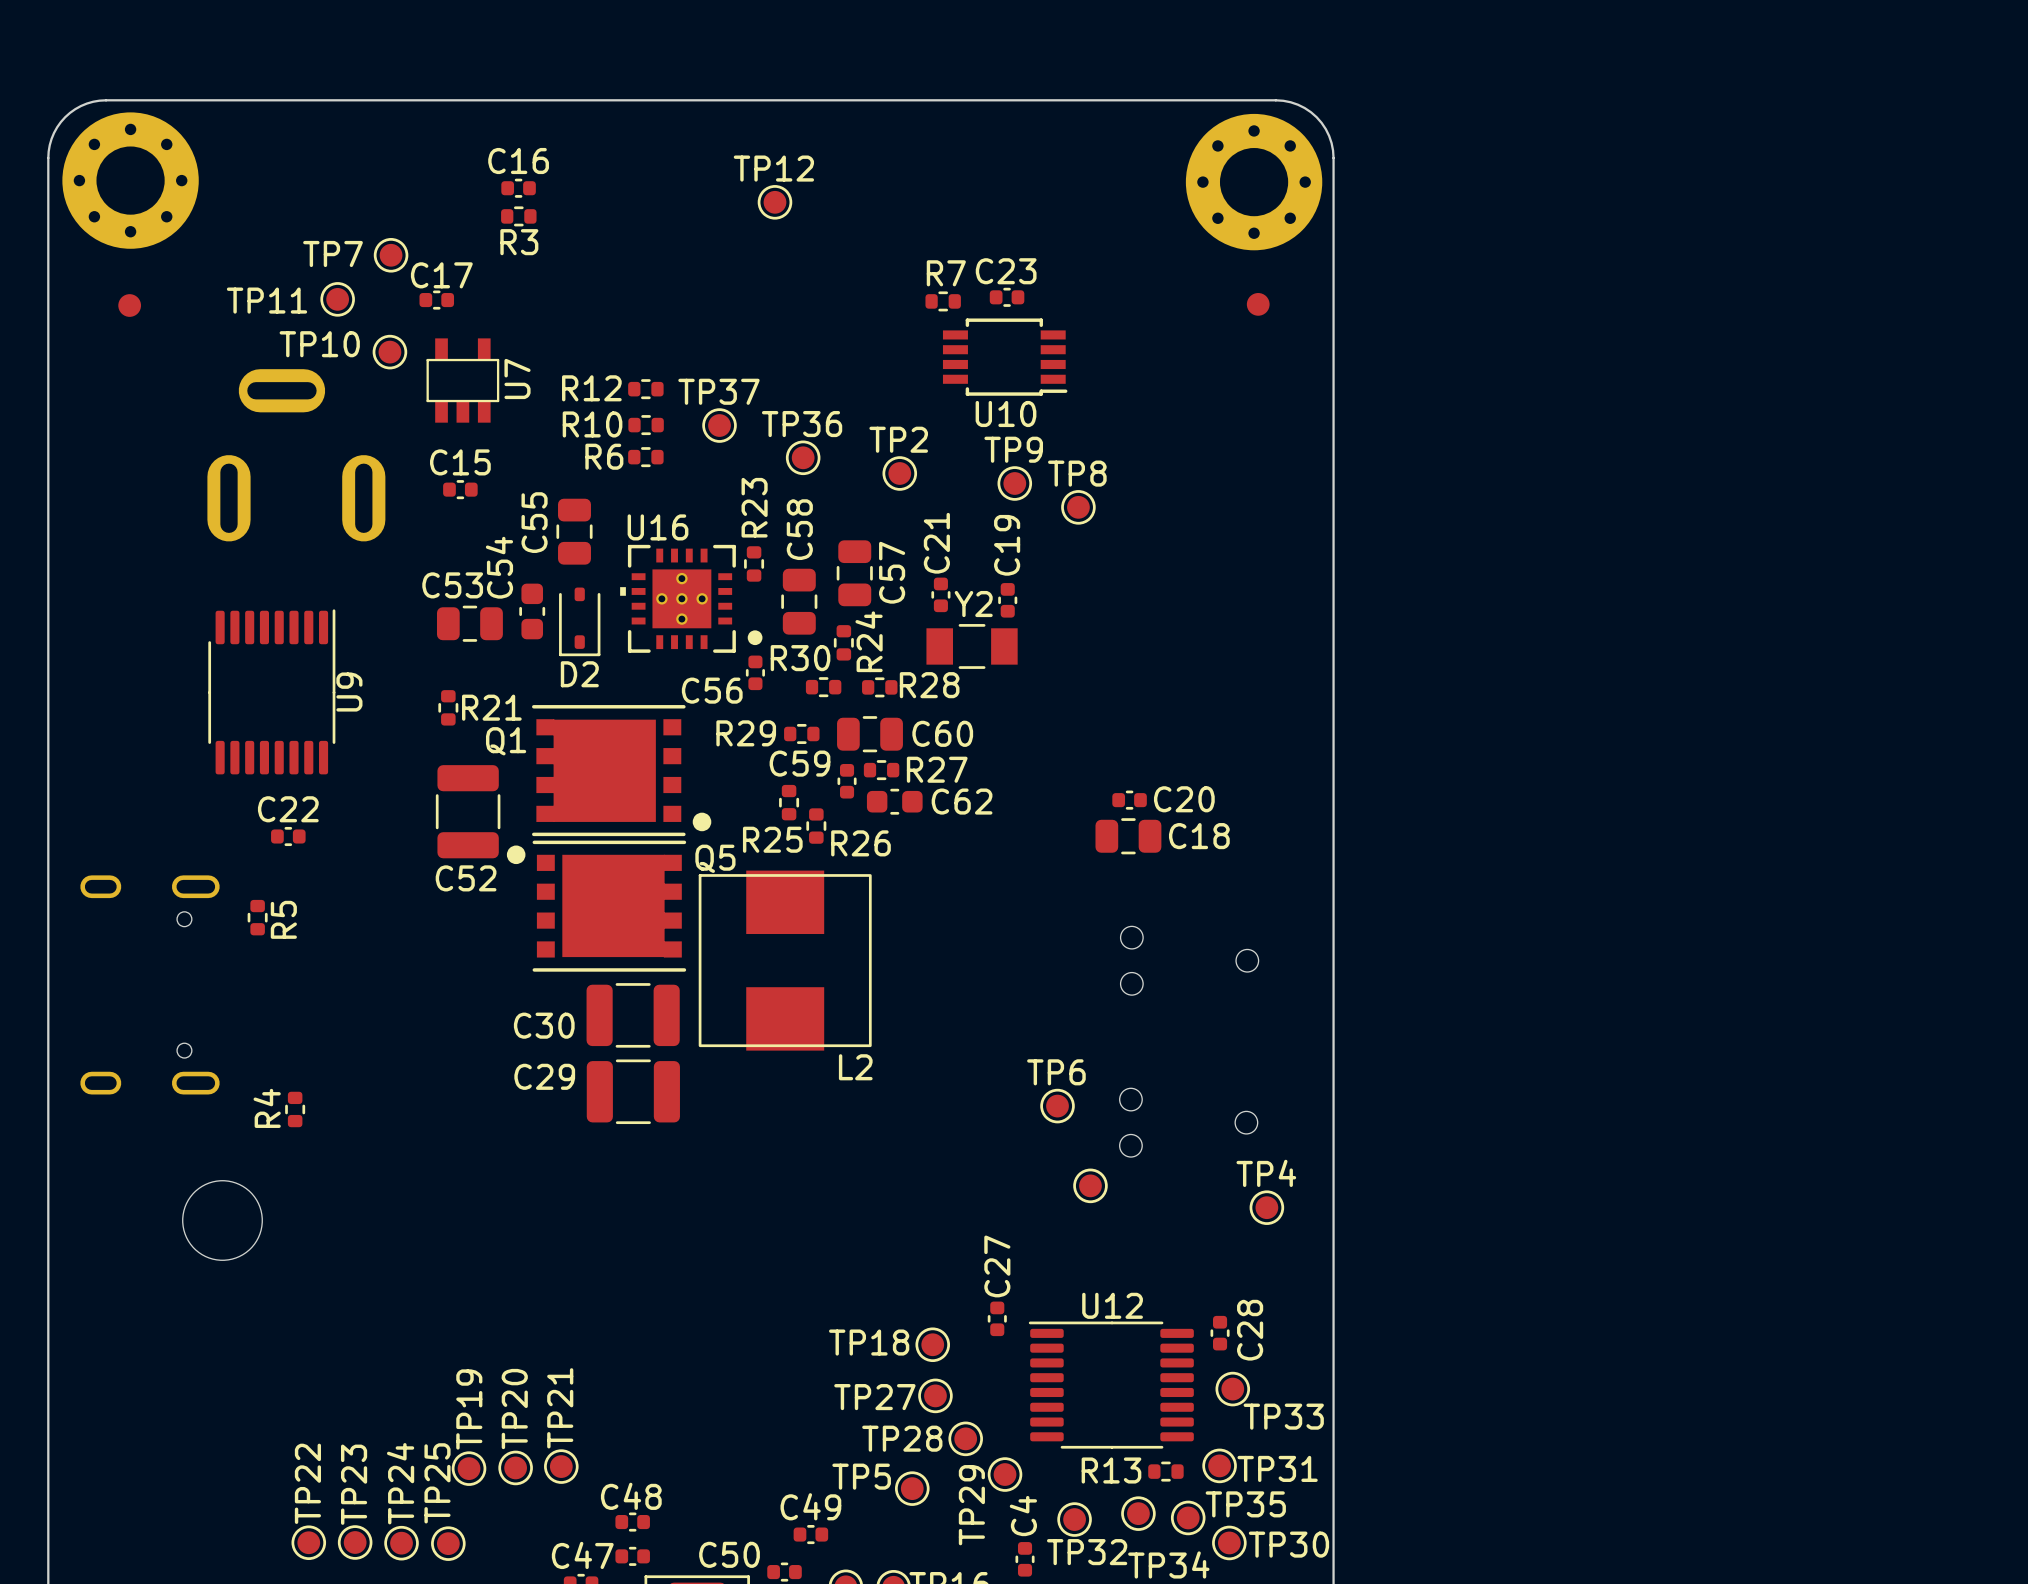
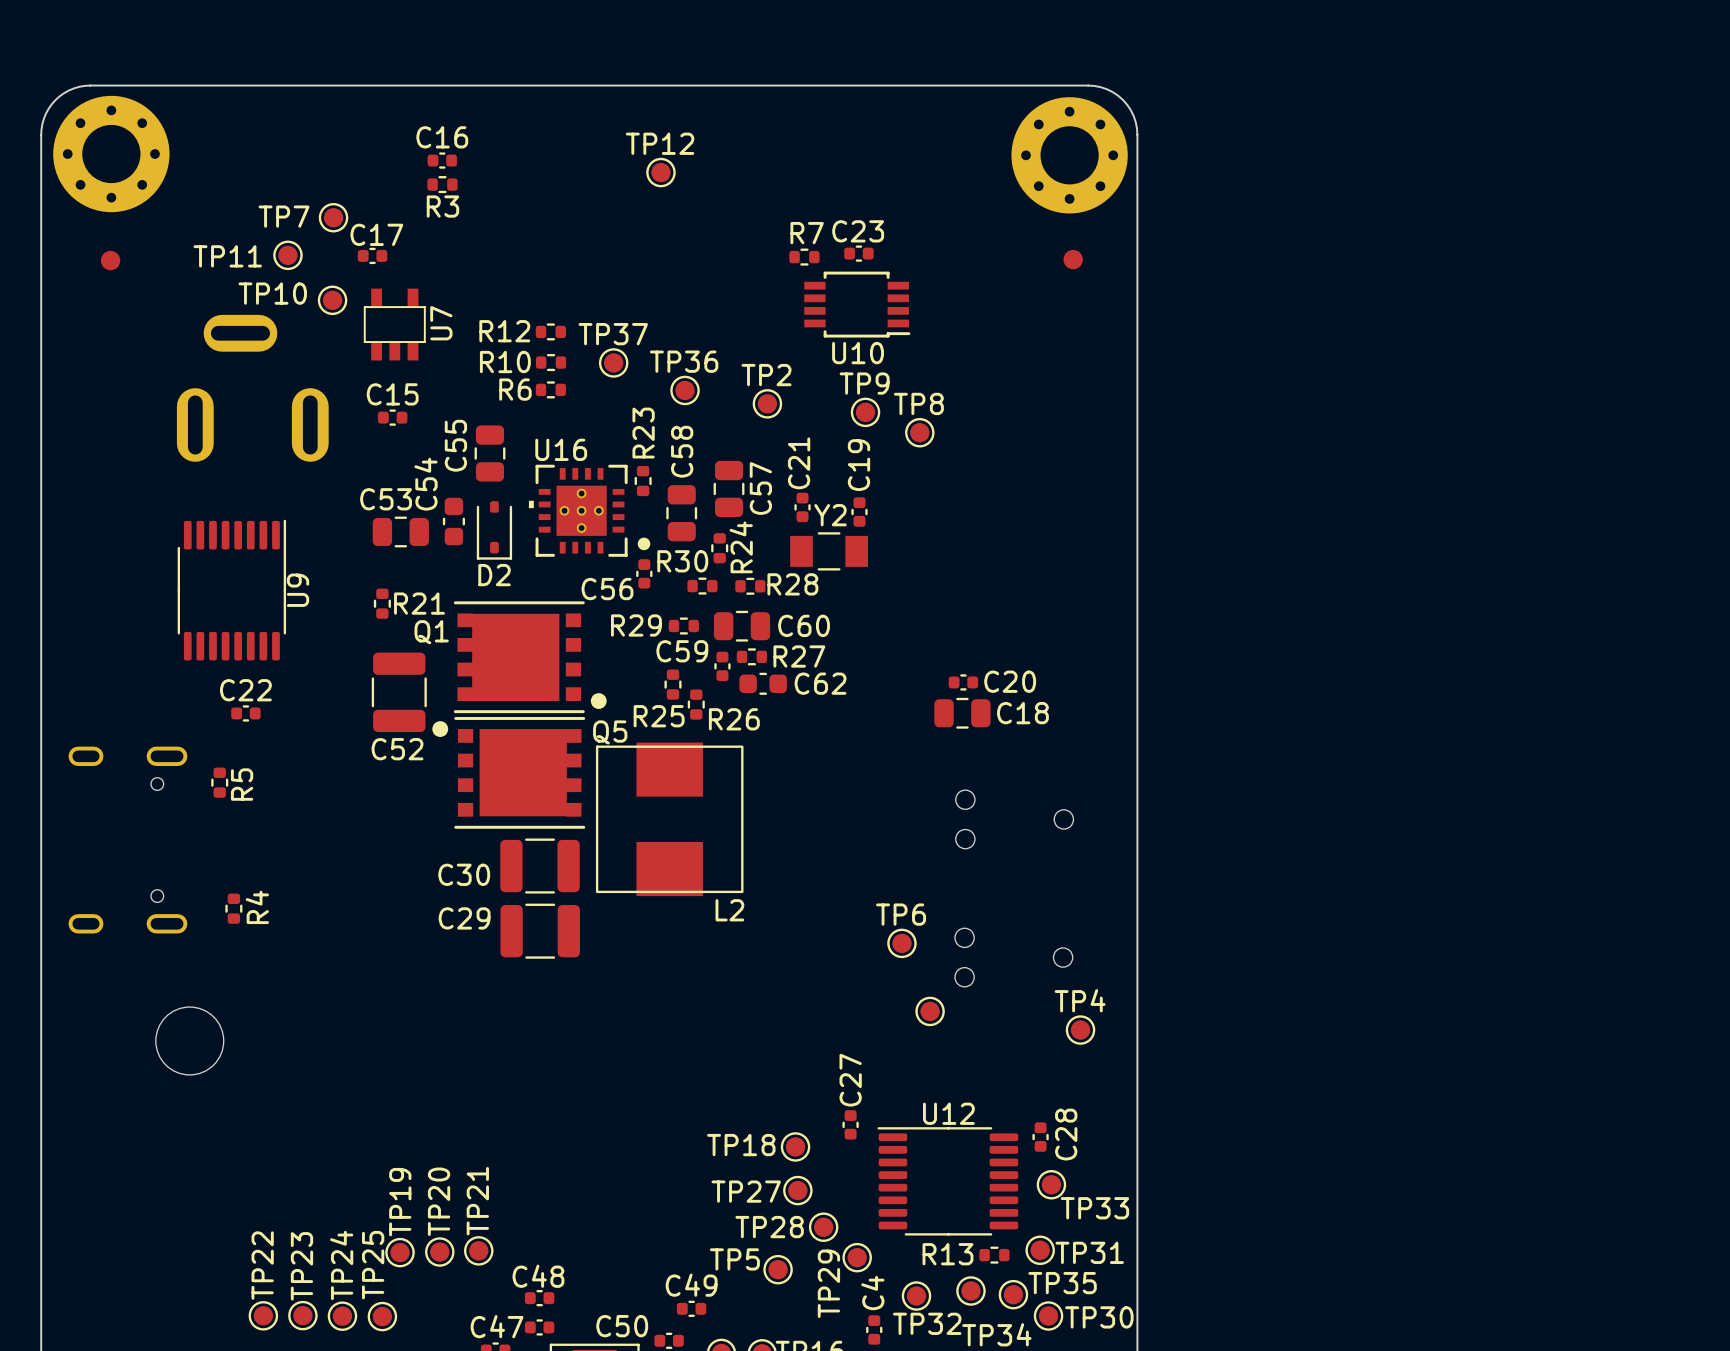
R4 name position: R4 (267, 1108) -> R4 (257, 907)
R4 position: (295, 1109) -> (233, 908)

